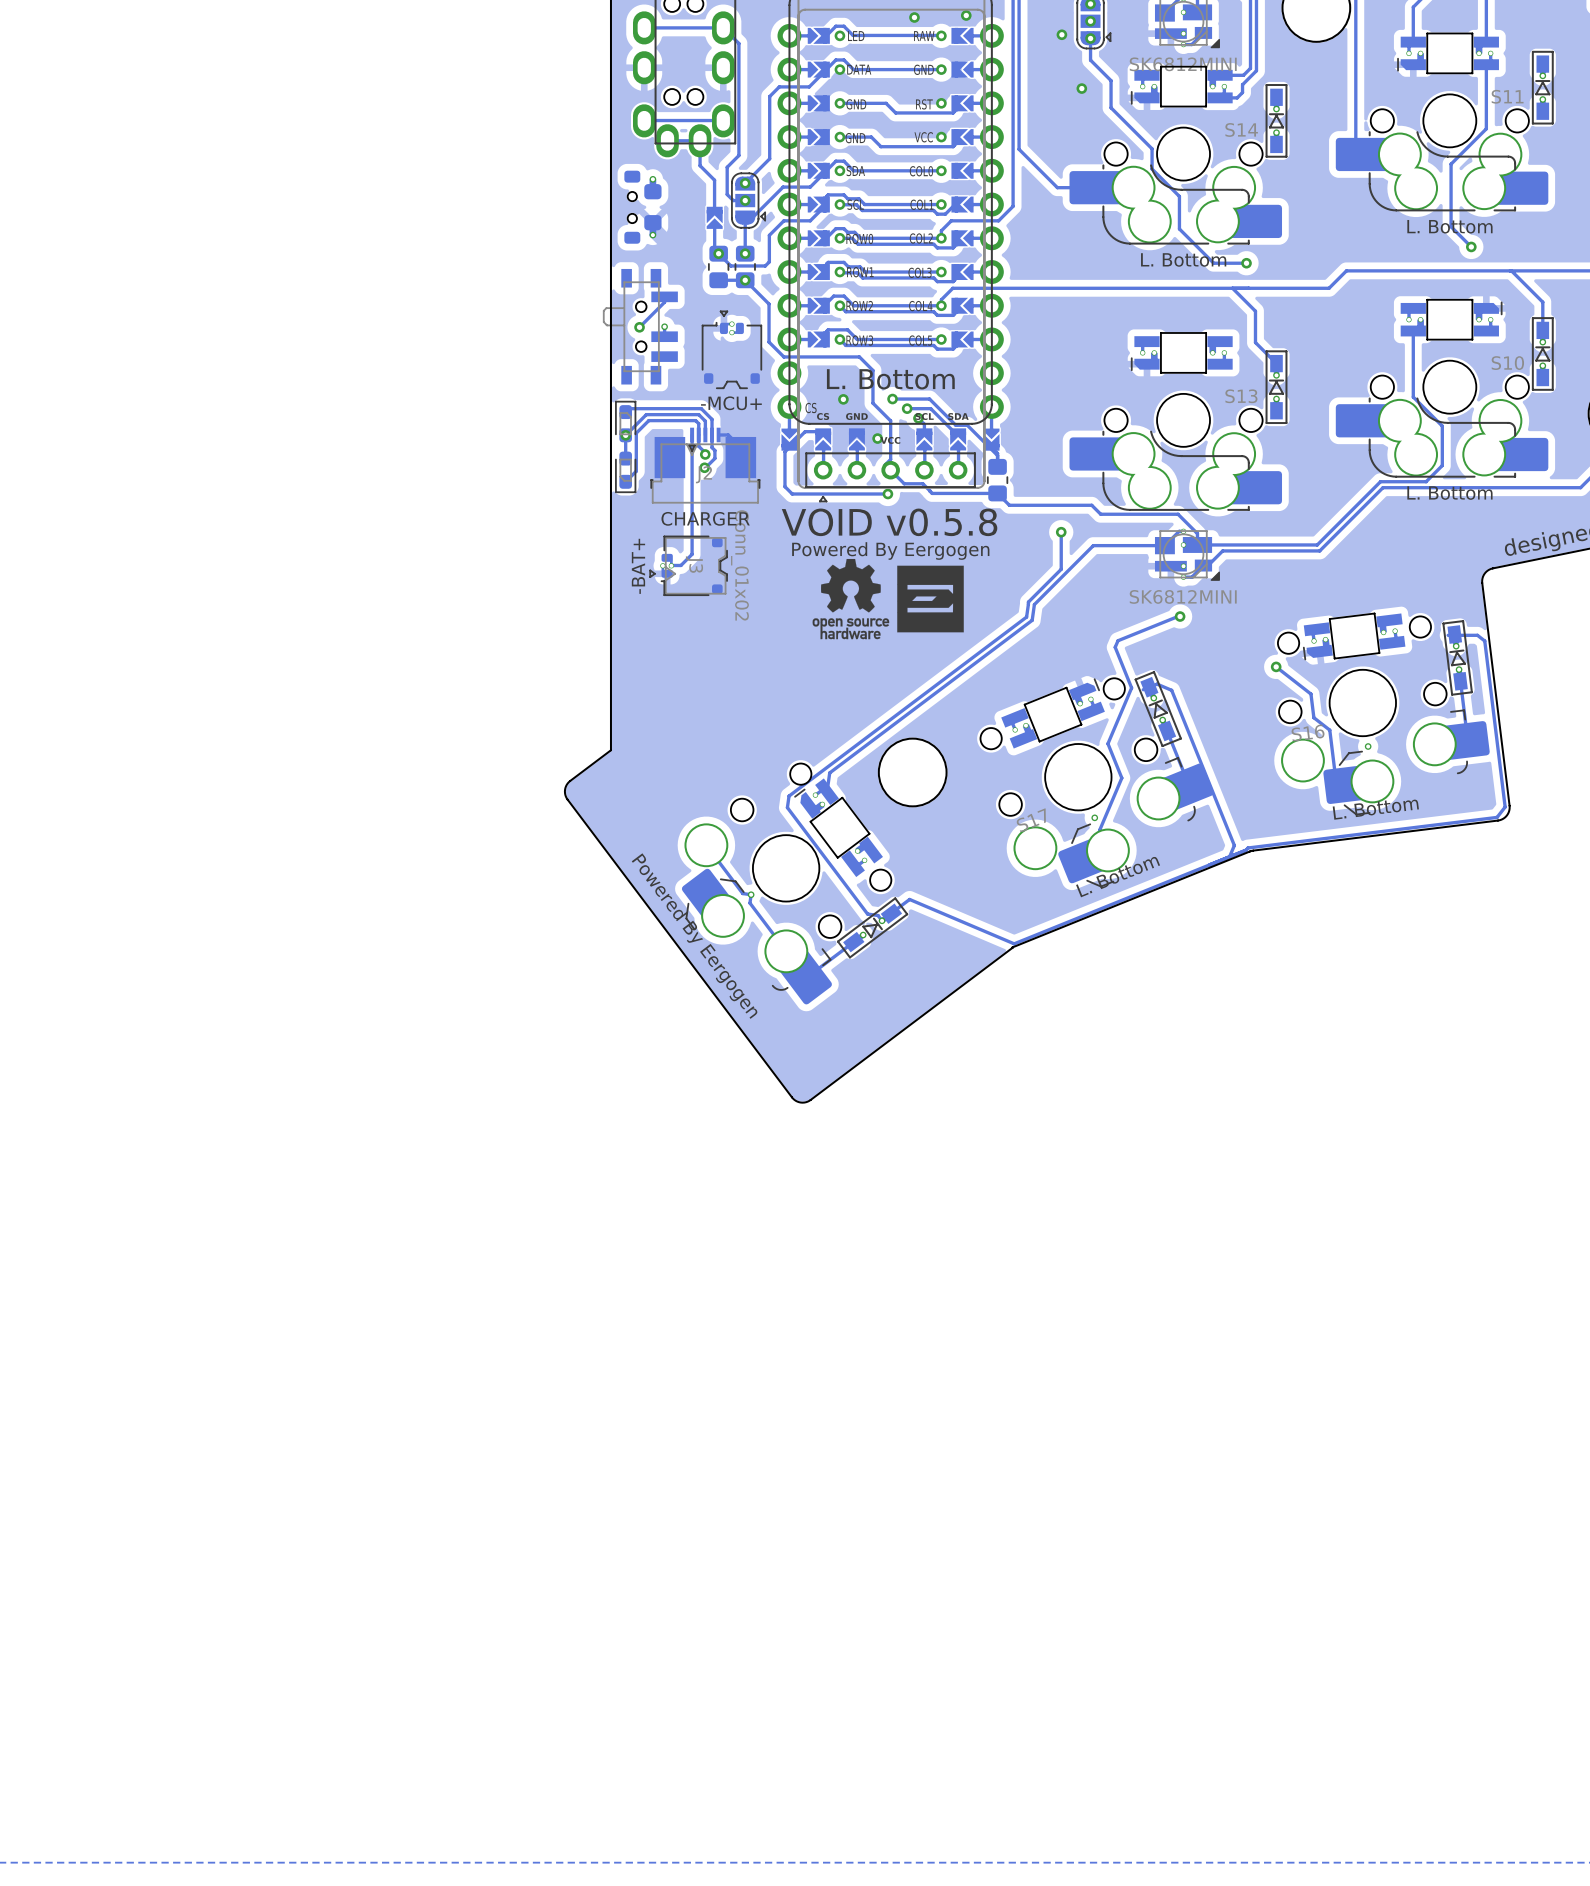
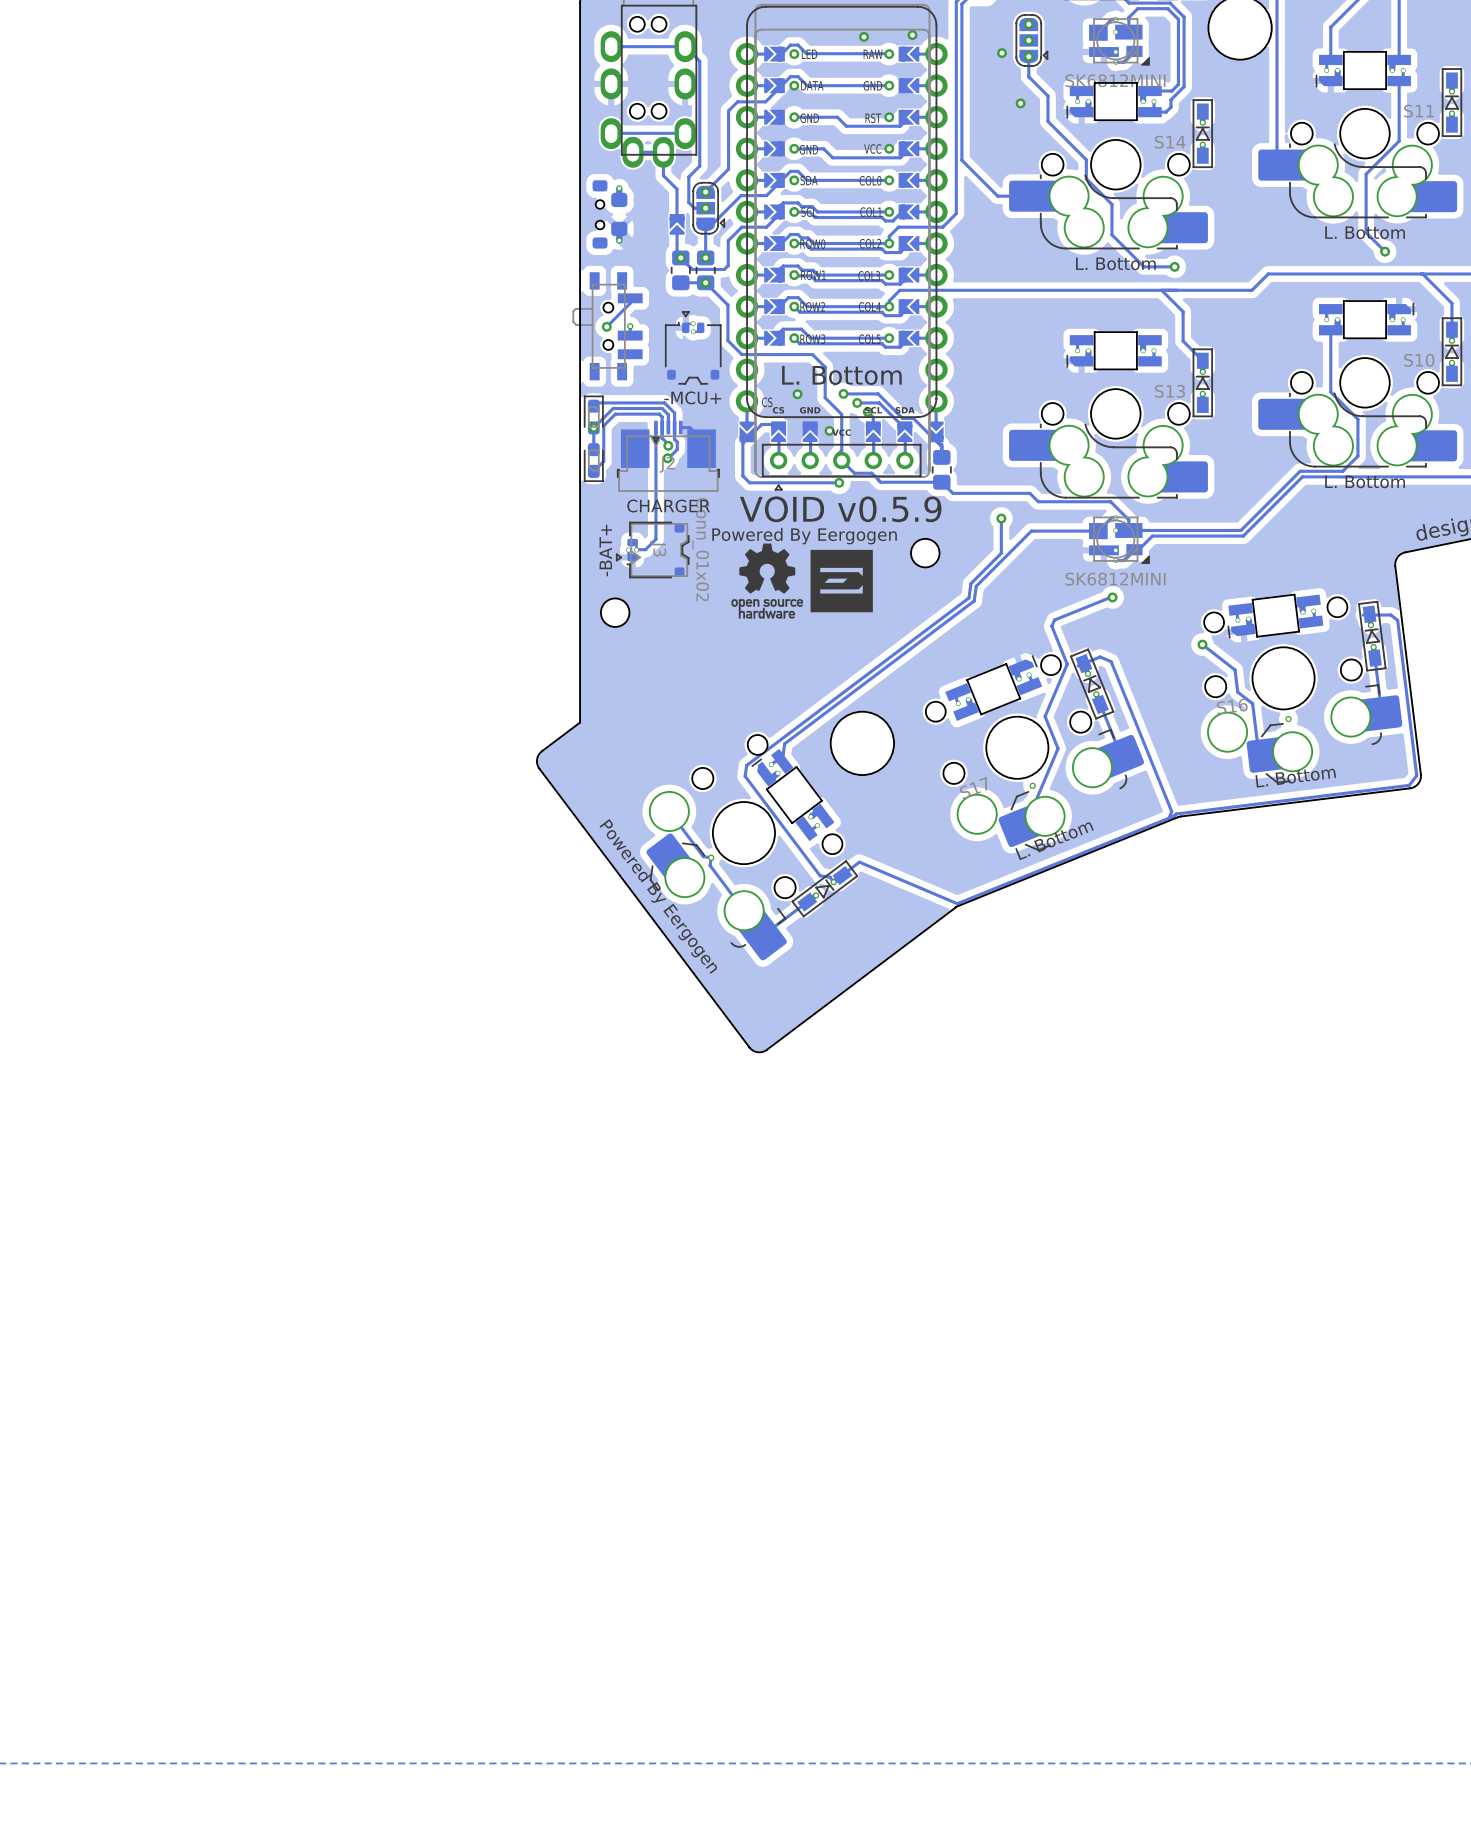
text: VOID v0.5.8 (889, 522) -> VOID v0.5.9 (840, 509)
text position: Powered By Eergogen (890, 550) -> Powered By Eergogen (804, 536)
round board edge: none -> [910, 537, 941, 569]
drawing position: (850, 599) -> (767, 581)
drawing position: (930, 599) -> (841, 581)
round board edge: none -> [599, 597, 631, 628]
track: (1157, 684) (1171, 690) (1234, 845) (1229, 856) (1209, 864) -> (1091, 660) (1100, 657) (1111, 661) (1171, 811) (1168, 818) (1174, 815)

